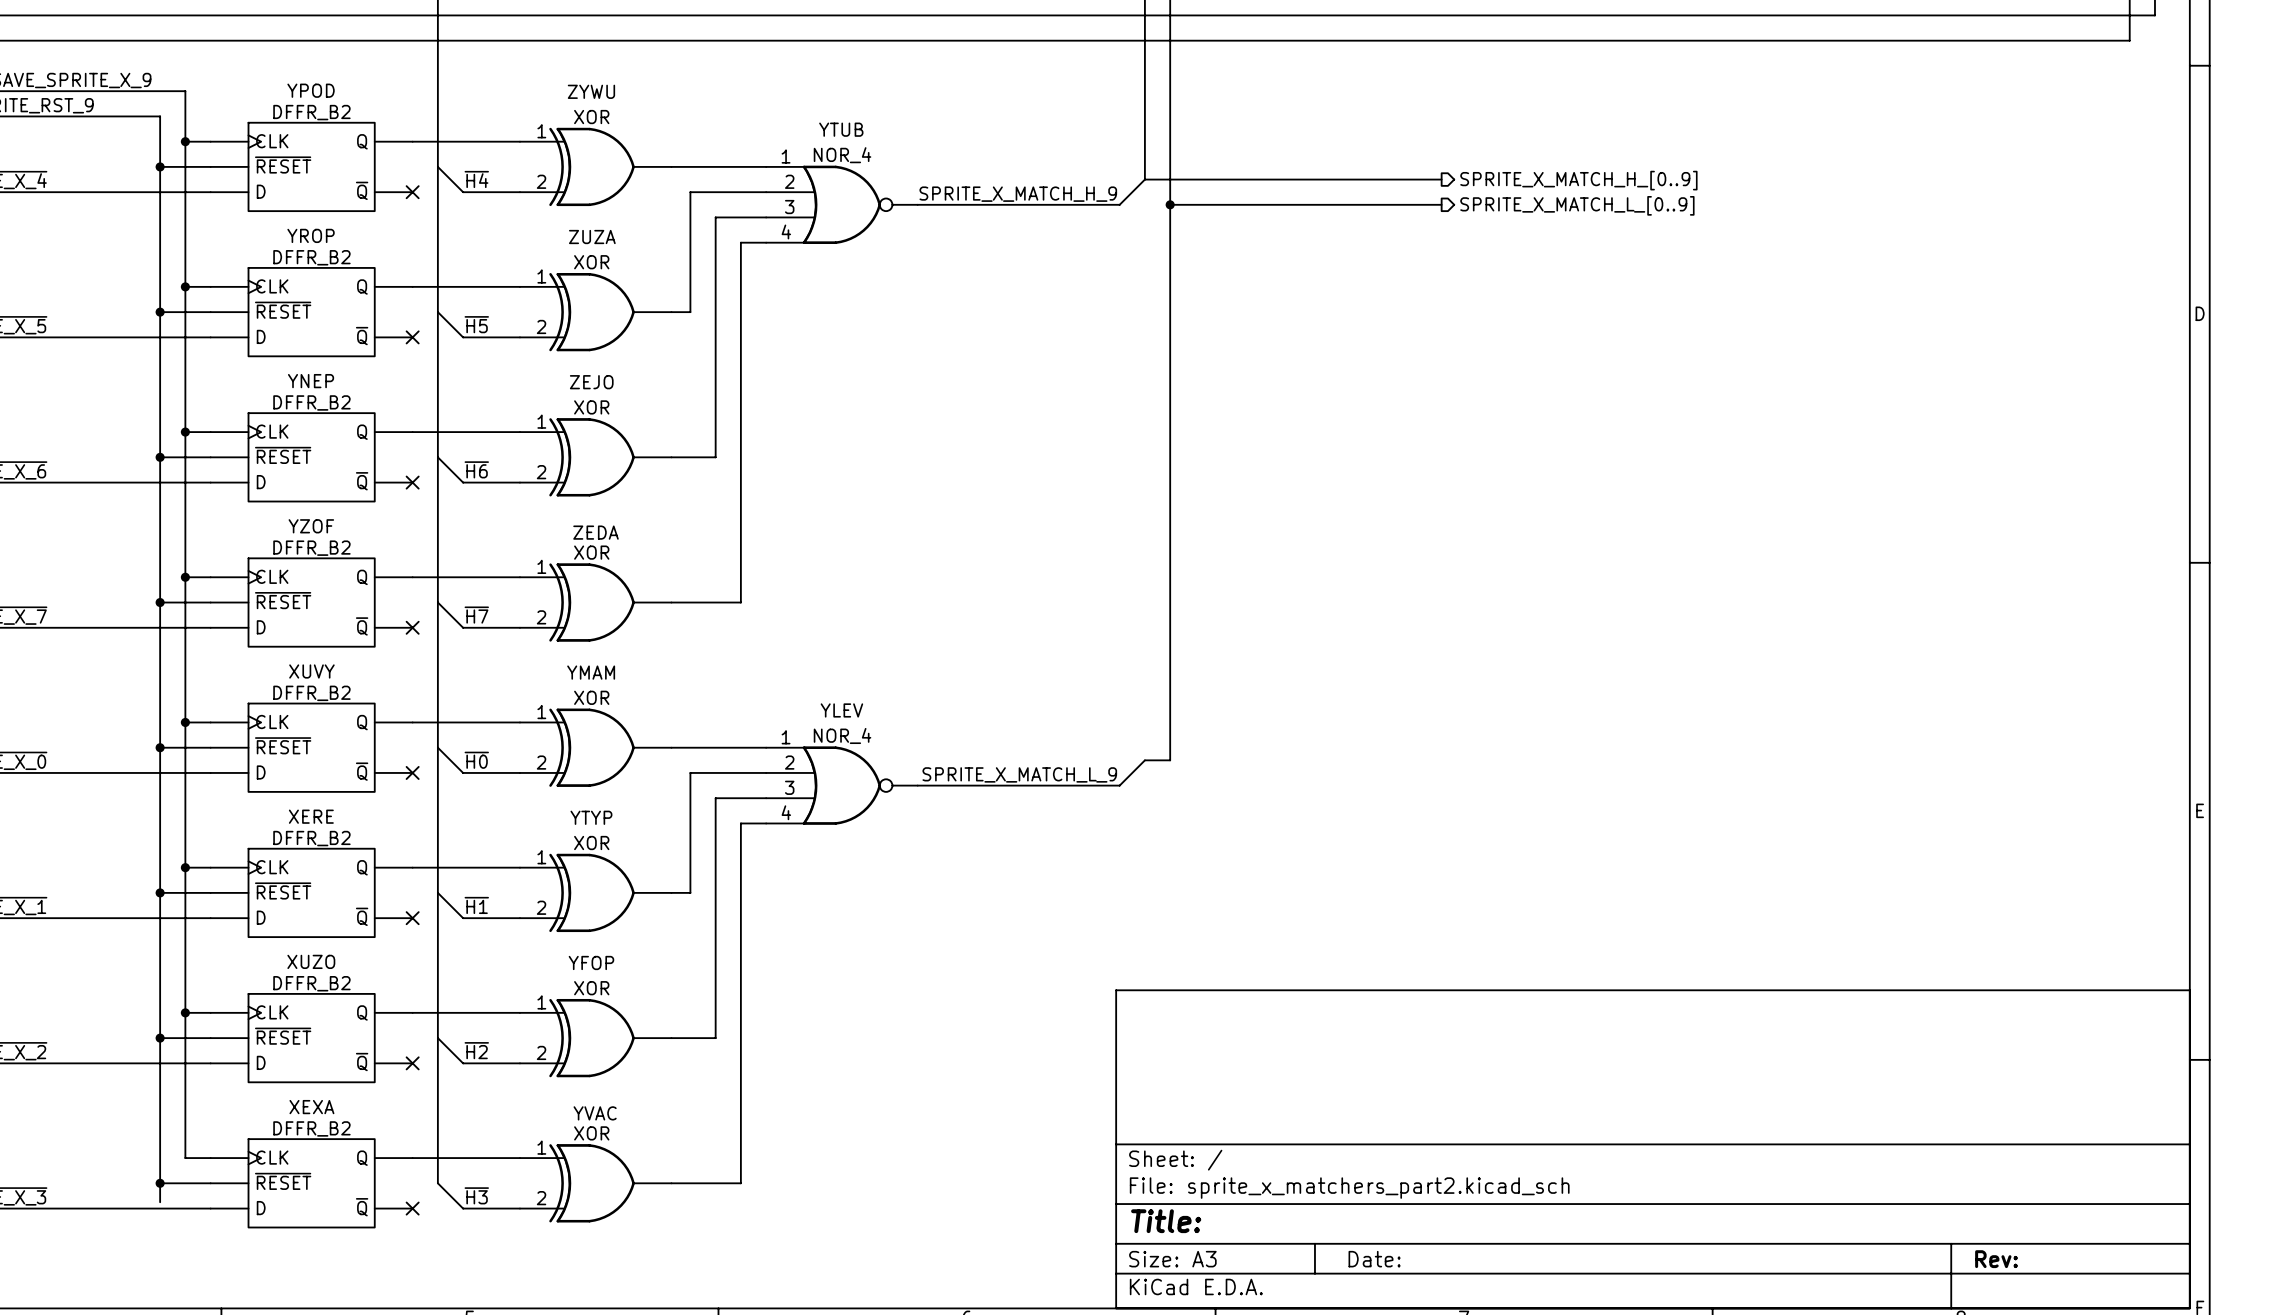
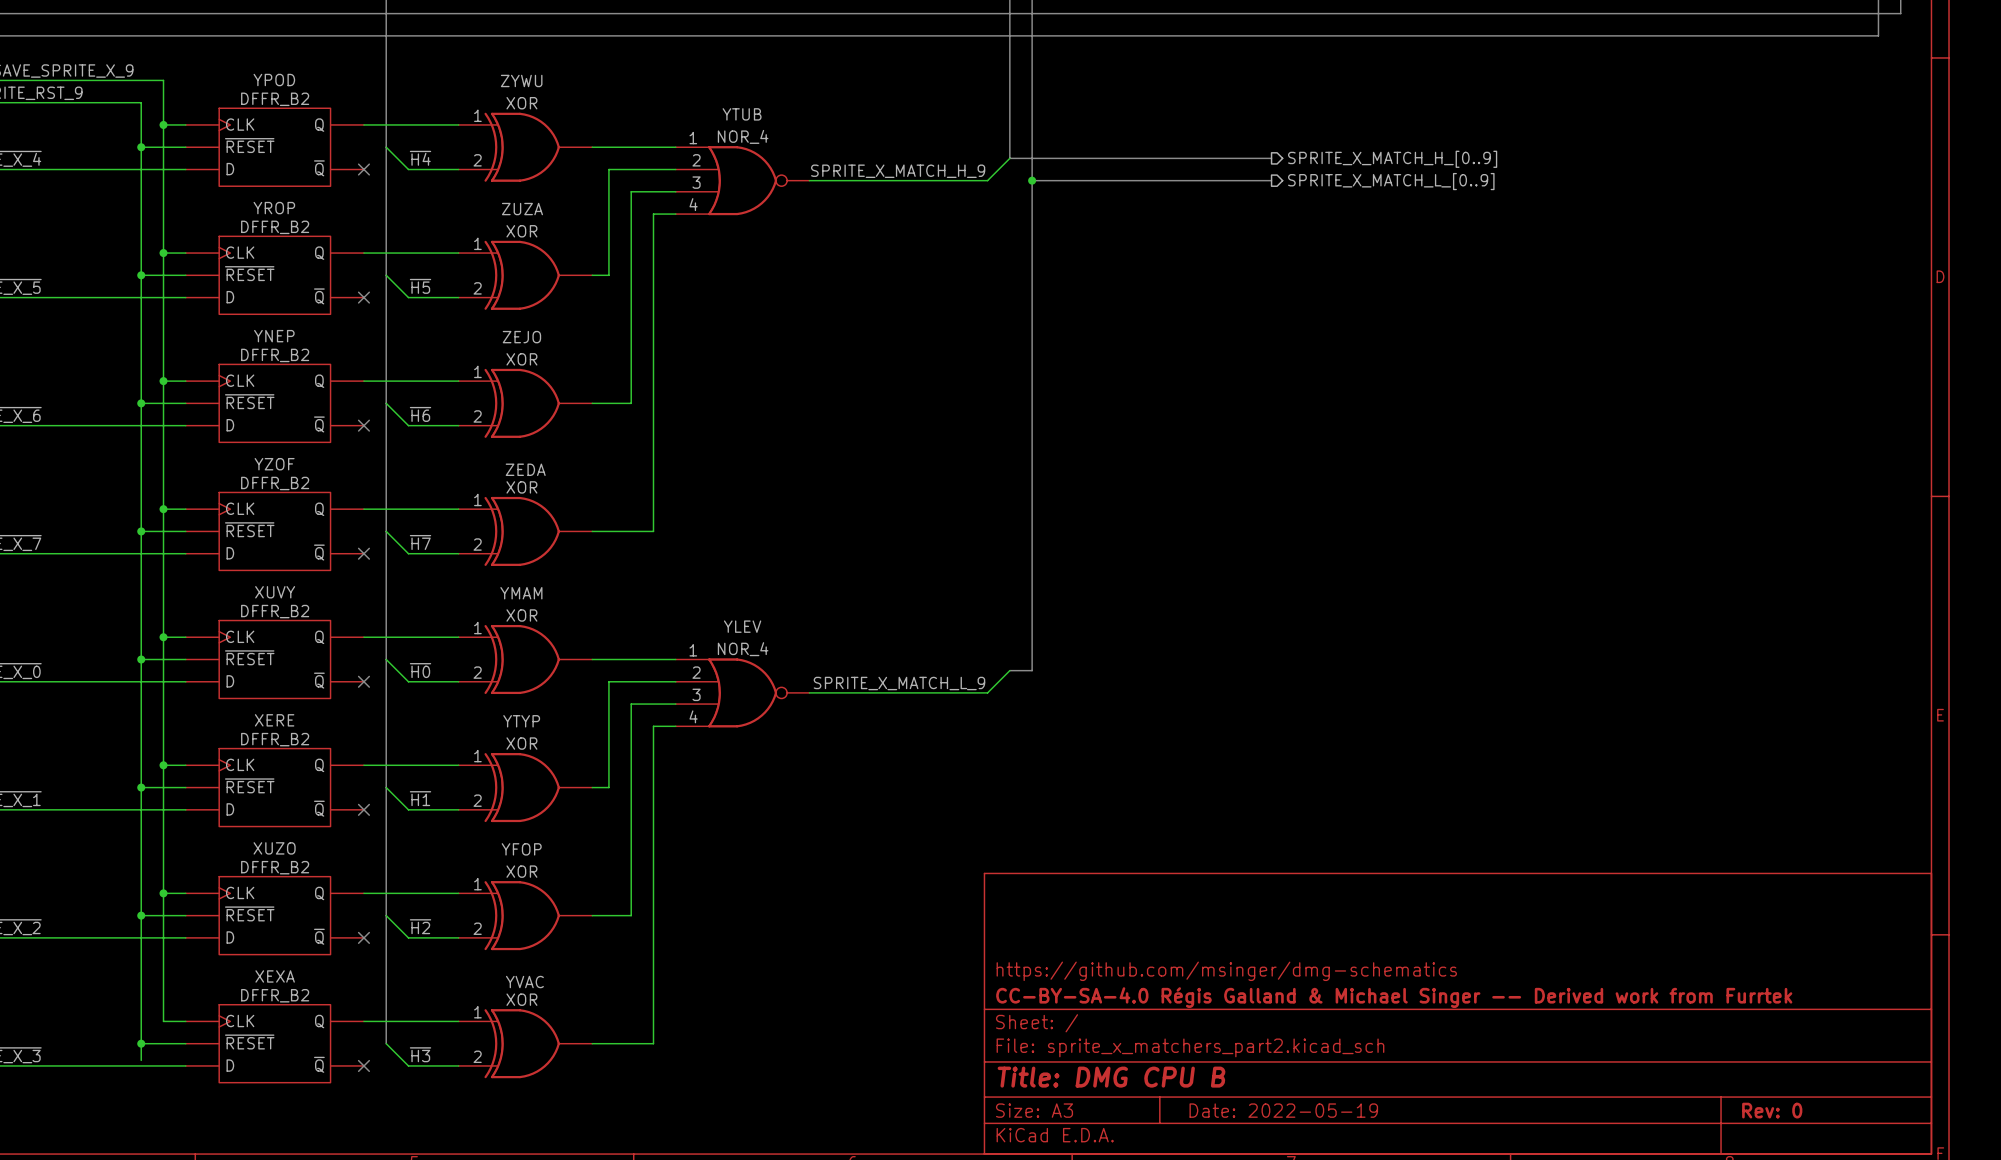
title block: none -> https://github.com/msinger/dmg-schematics (1226, 971)
title block: none -> CC-BY-SA-4.0 Régis Galland & Michael Singer -- Derived work from Furrtek (1394, 997)
title block: Title: (1166, 1221) -> Title: DMG CPU B (1111, 1077)
title block: Date: (1374, 1259) -> Date: 2022-05-19 (1283, 1110)
title block: Rev: (1996, 1259) -> Rev: 0 (1772, 1110)

